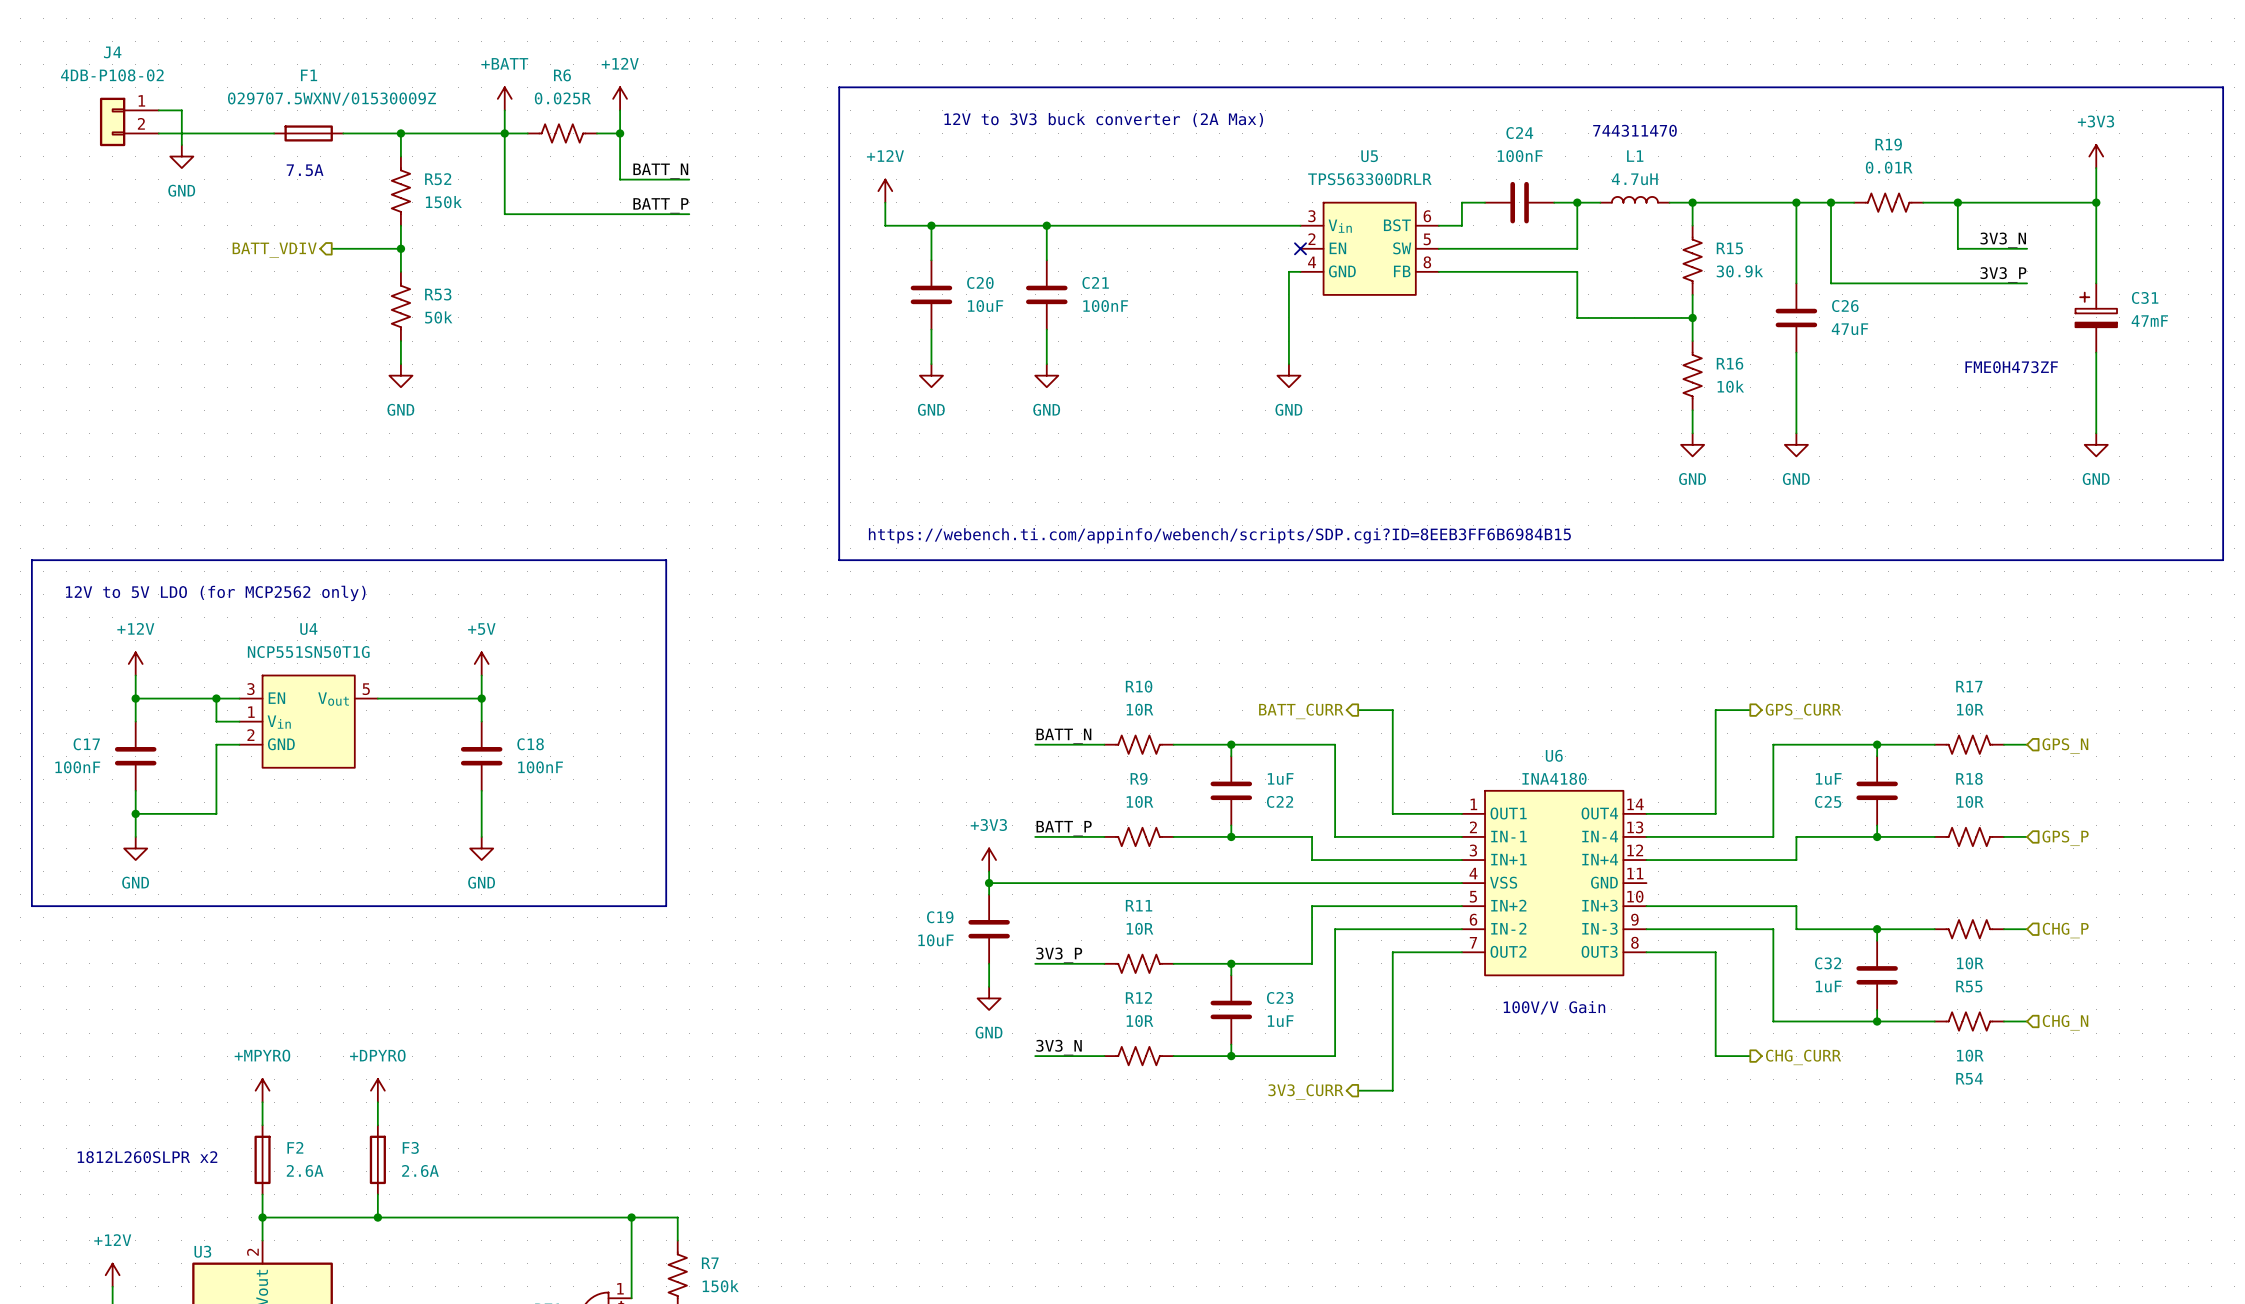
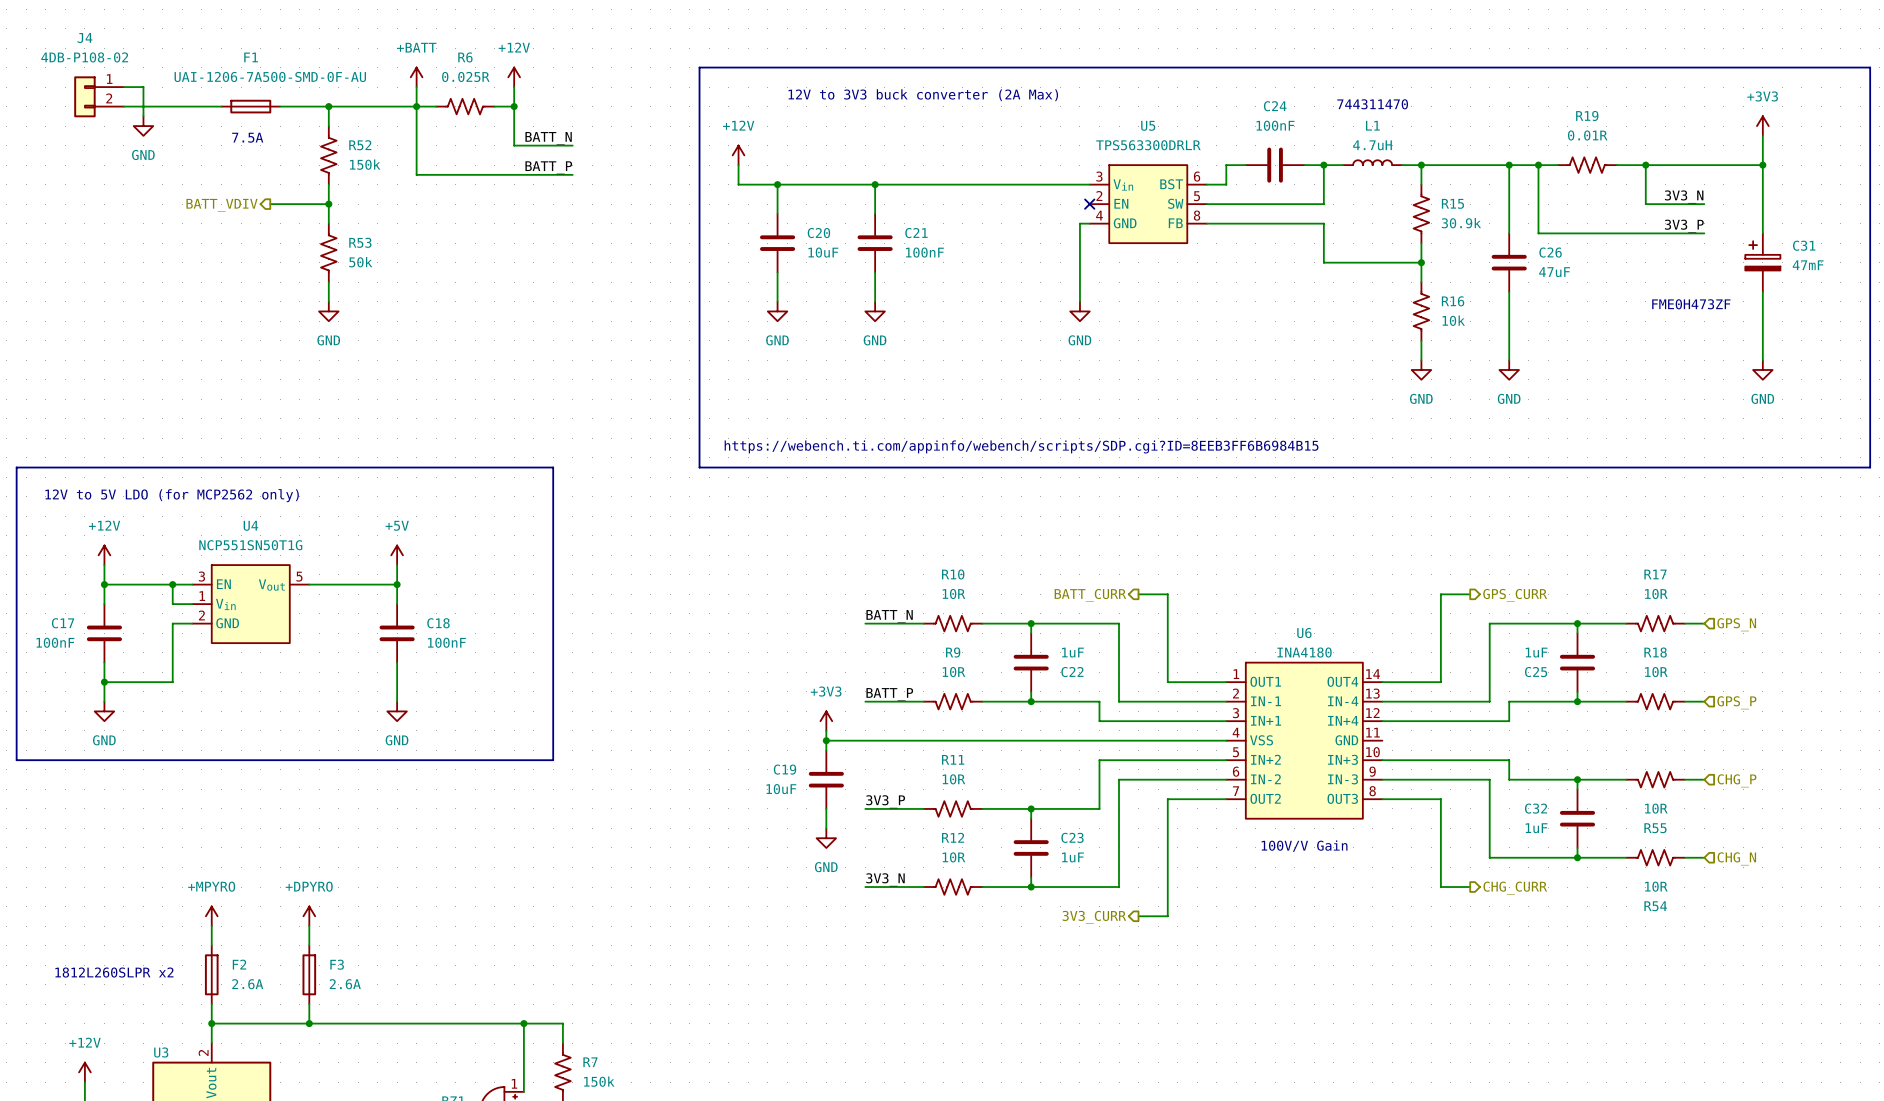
F1 value: 029707.5WXNV/01530009Z (332, 99) -> UAI-1206-7A500-SMD-0F-AU (270, 76)

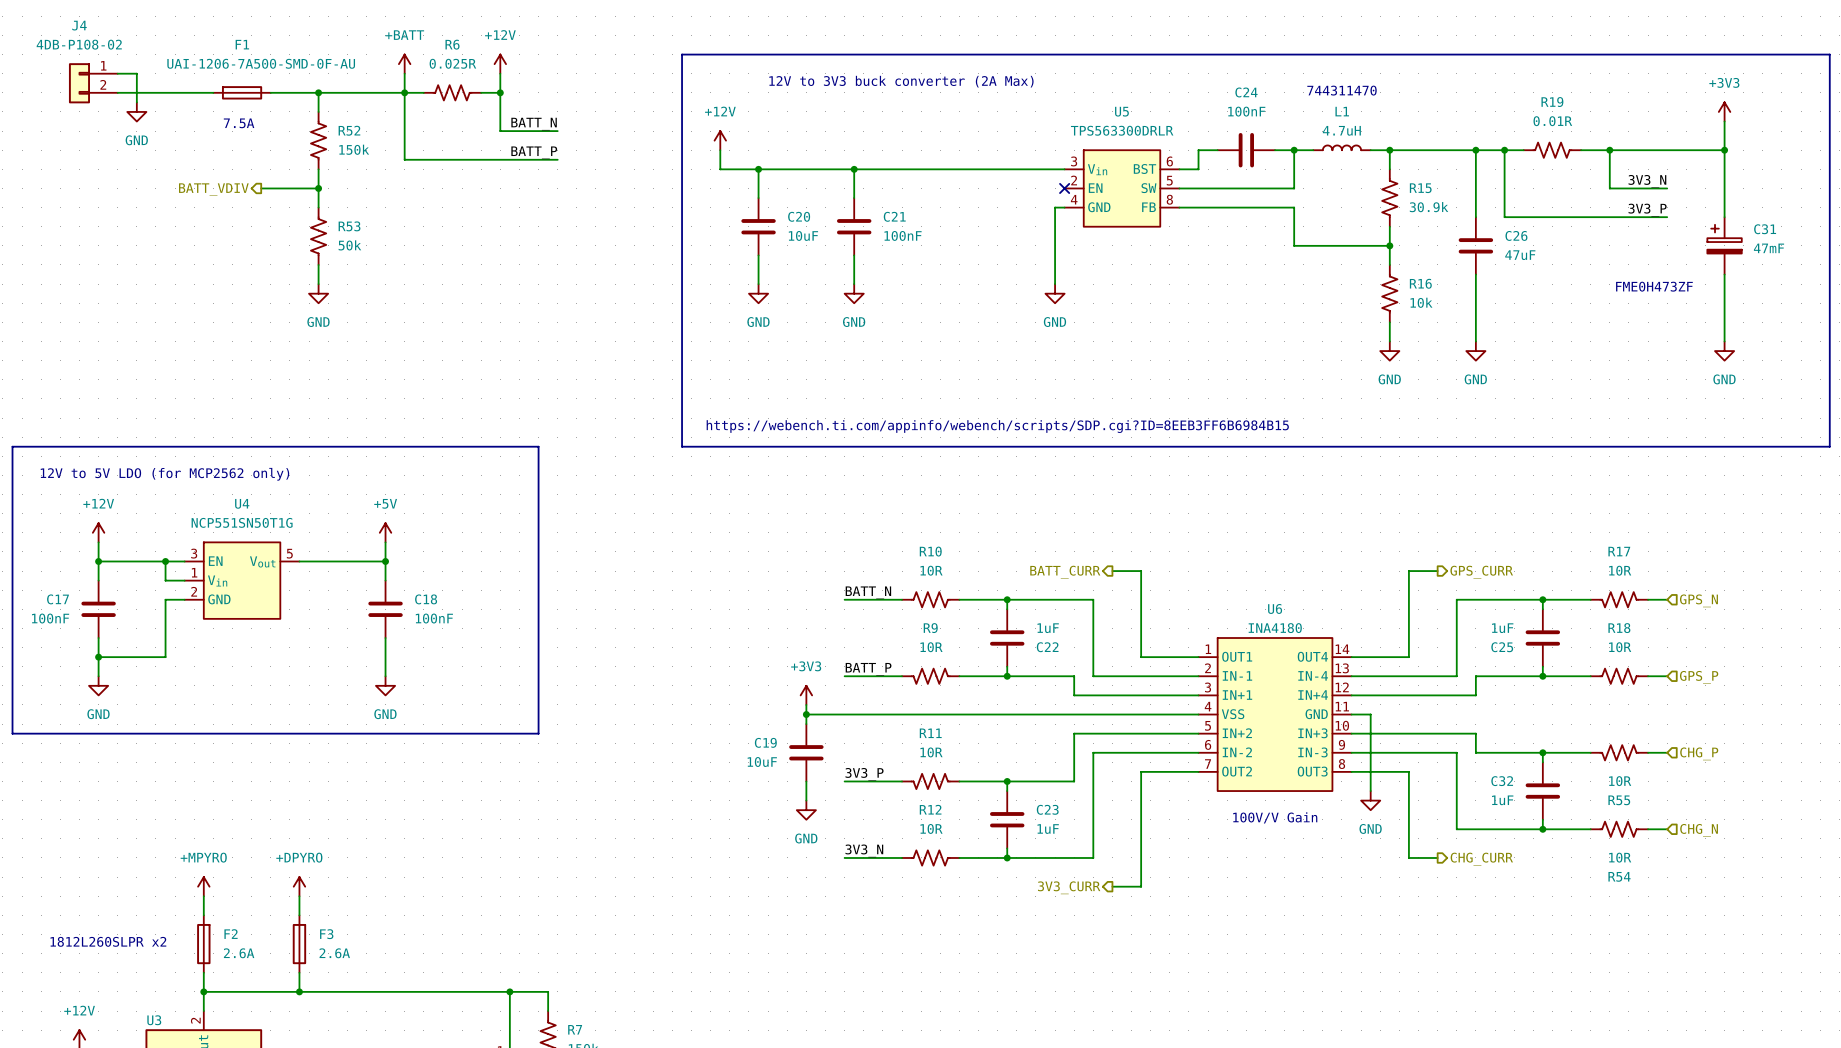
wire: none -> (1351, 714) (1370, 714) (1370, 791)
power symbol: none -> GND (1370, 800)

